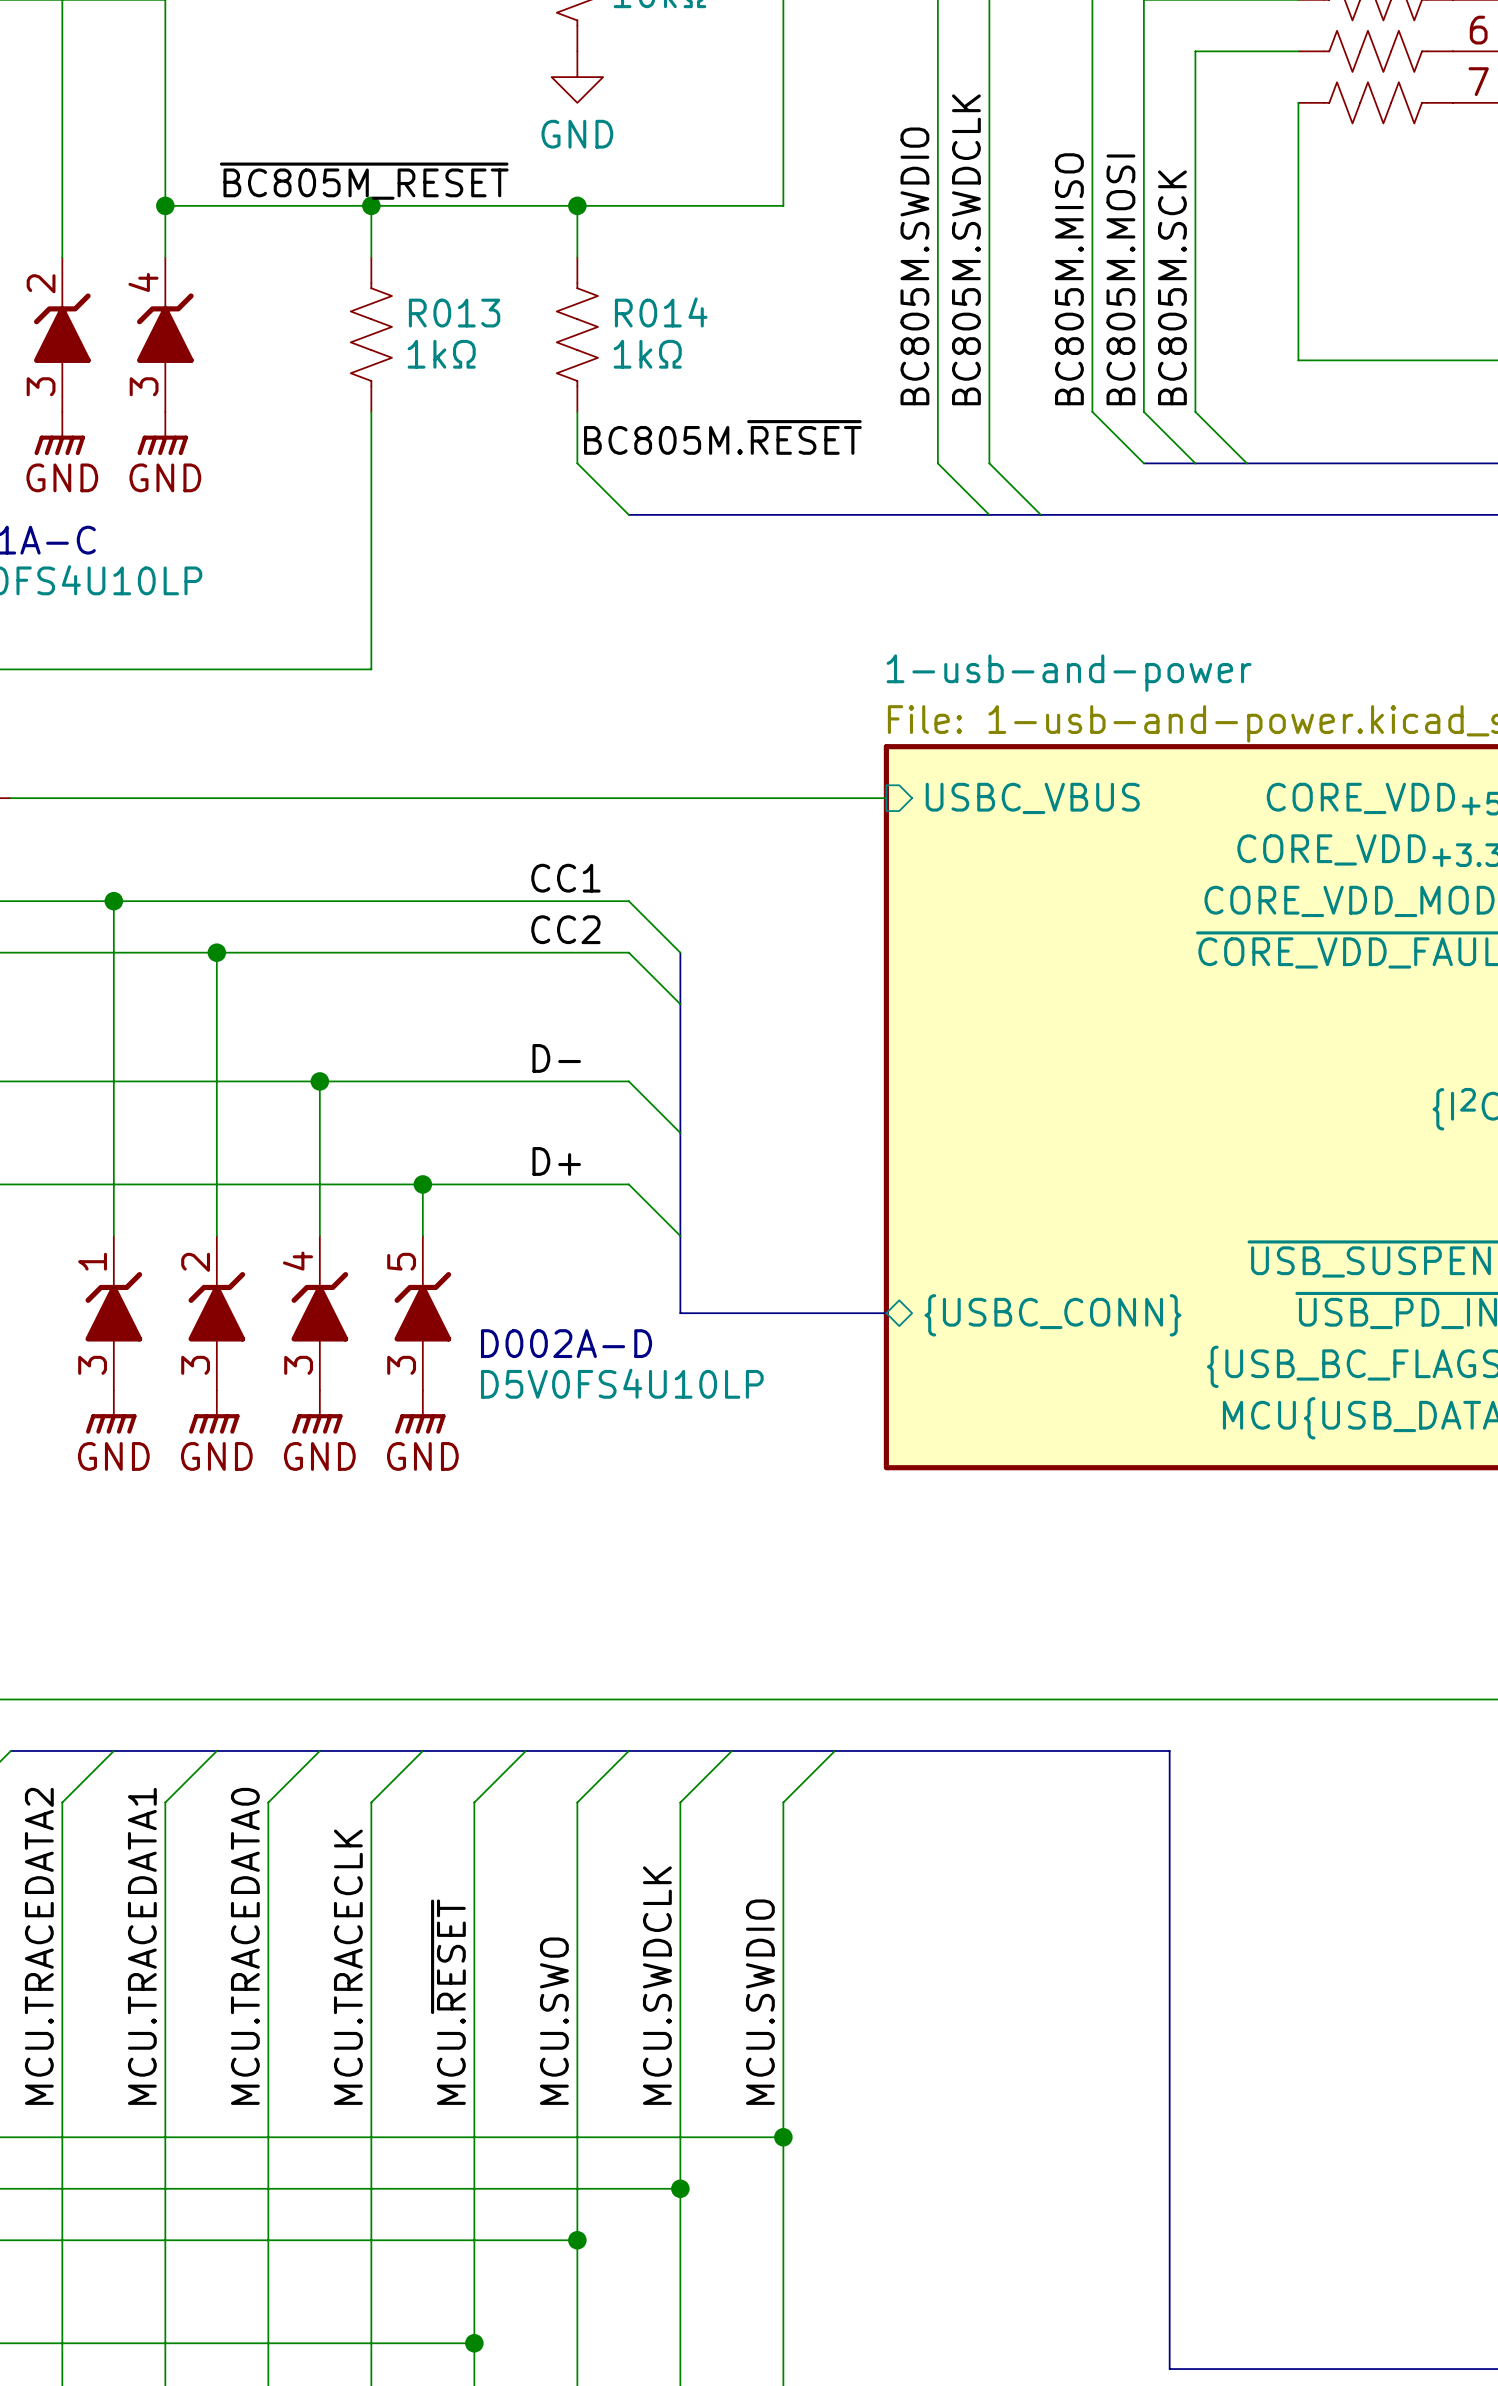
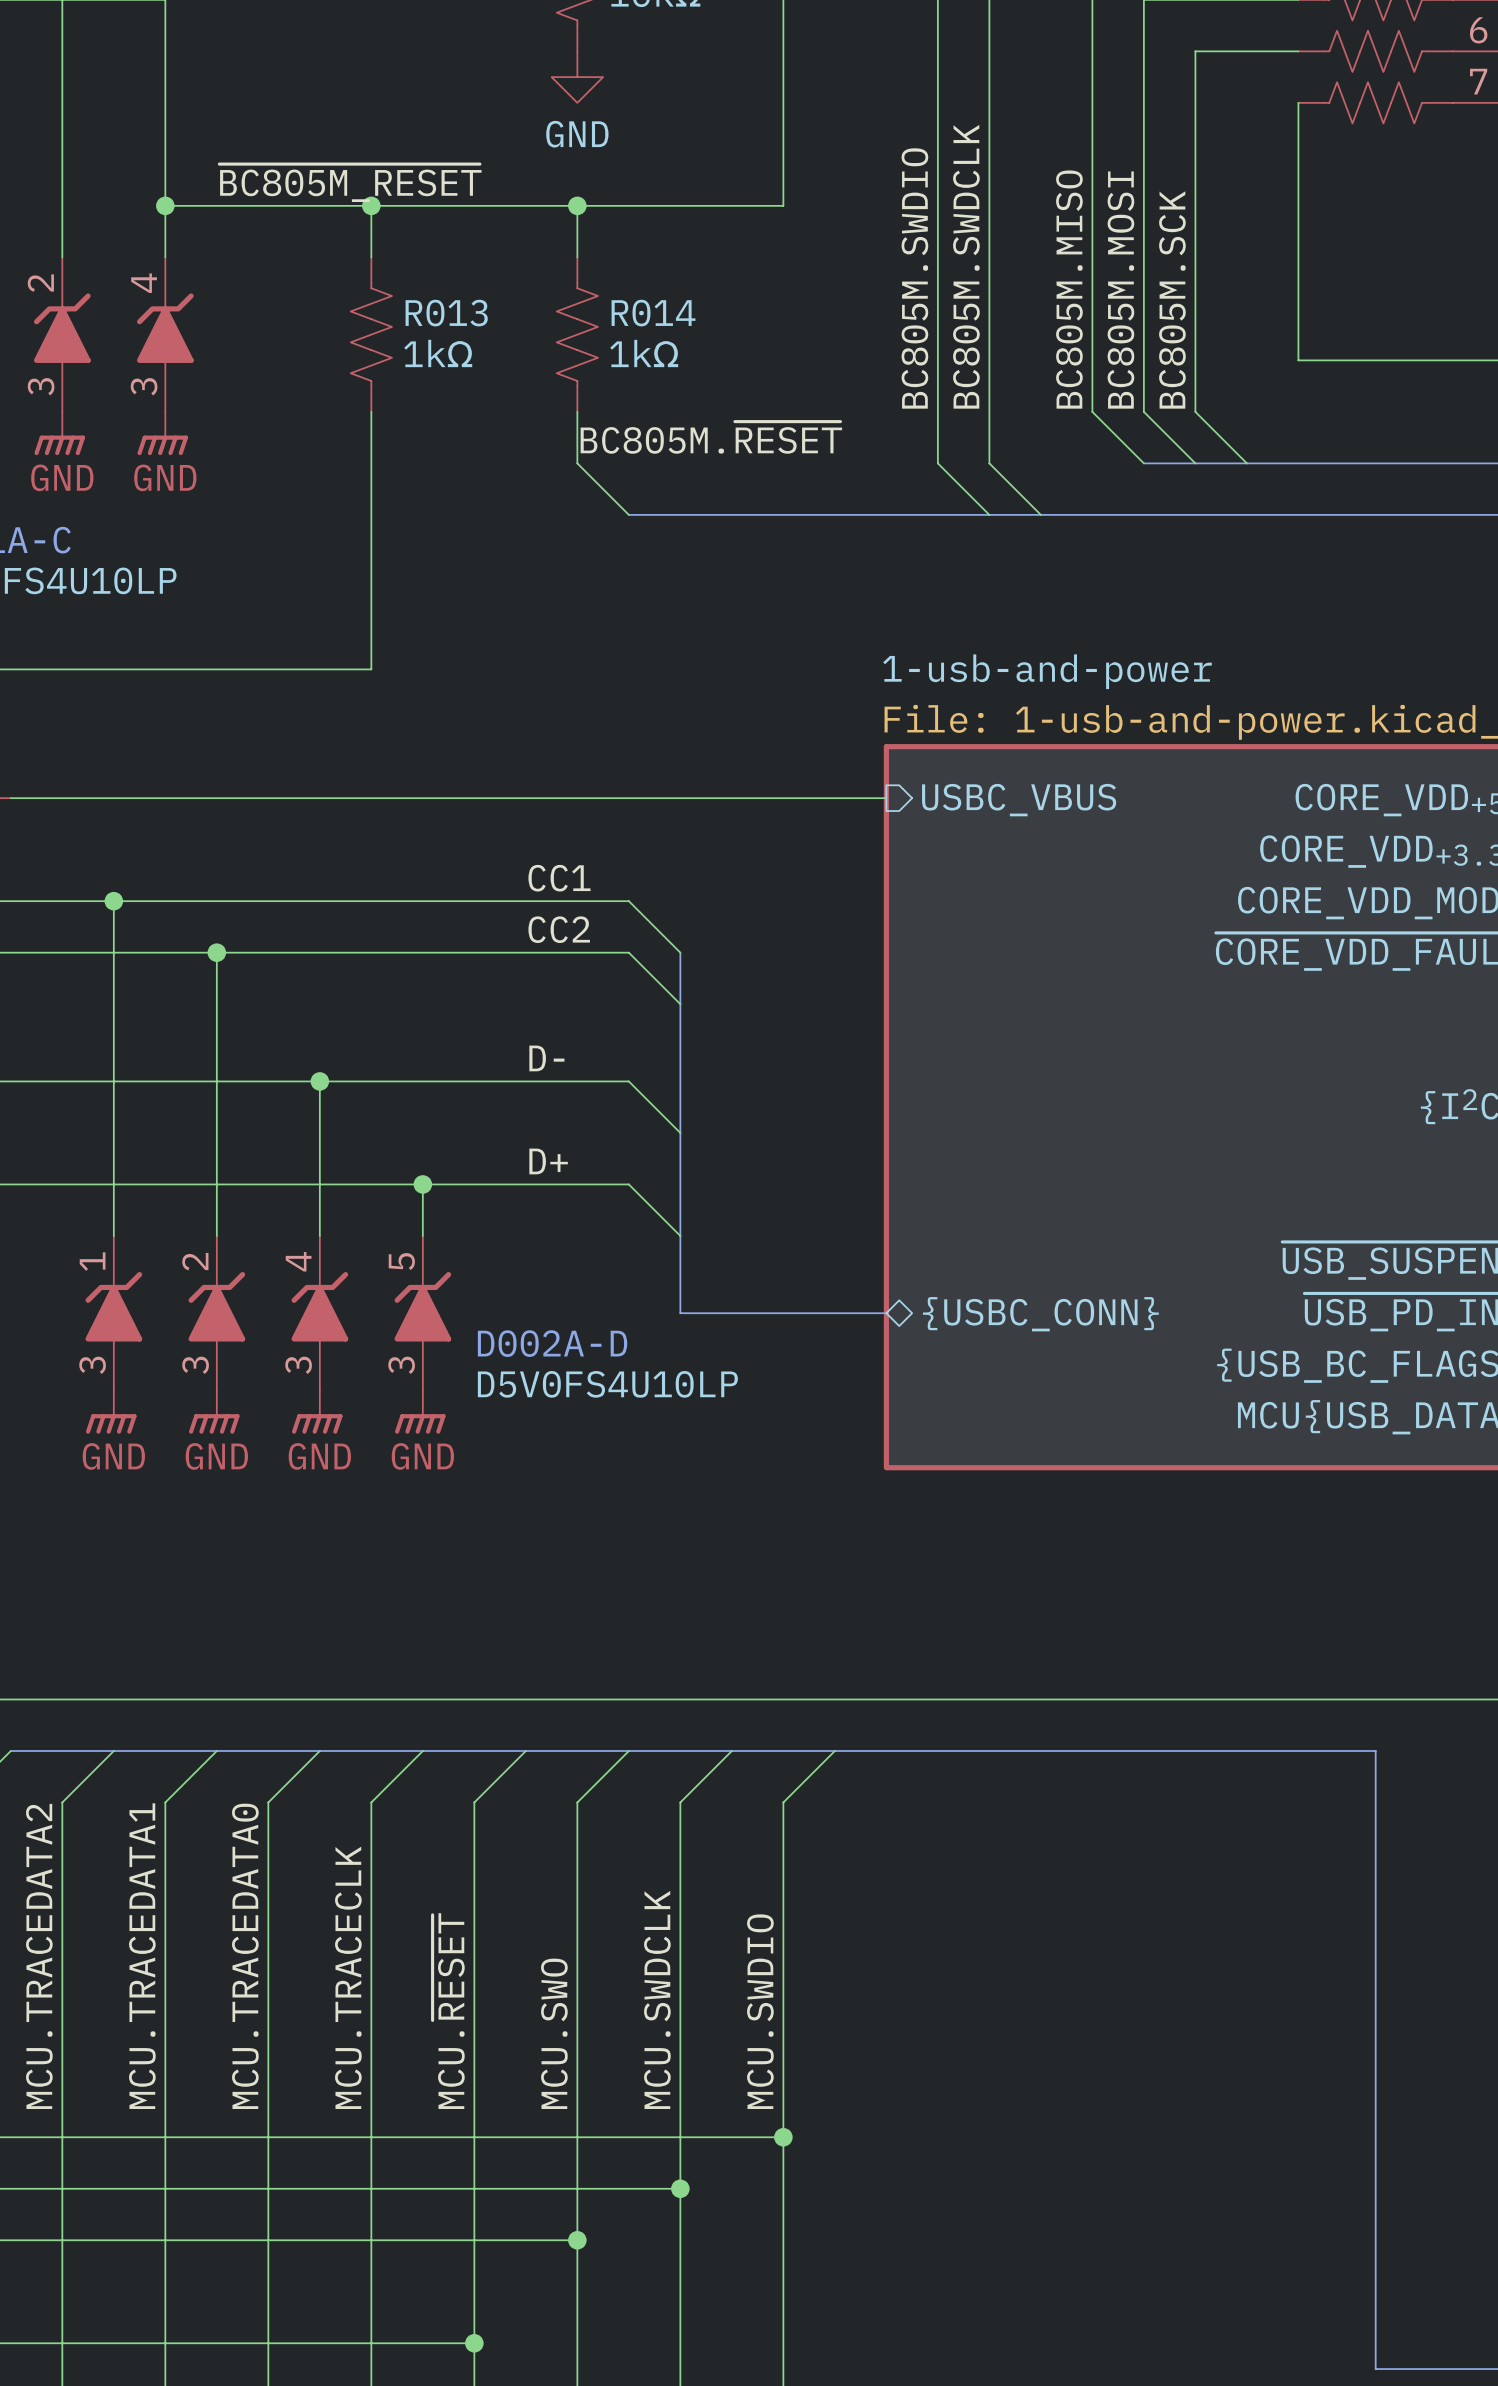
bus: (1169, 1750) (1169, 2369) (1375, 2369) -> (1169, 1750) (1375, 1750) (1375, 2369)

